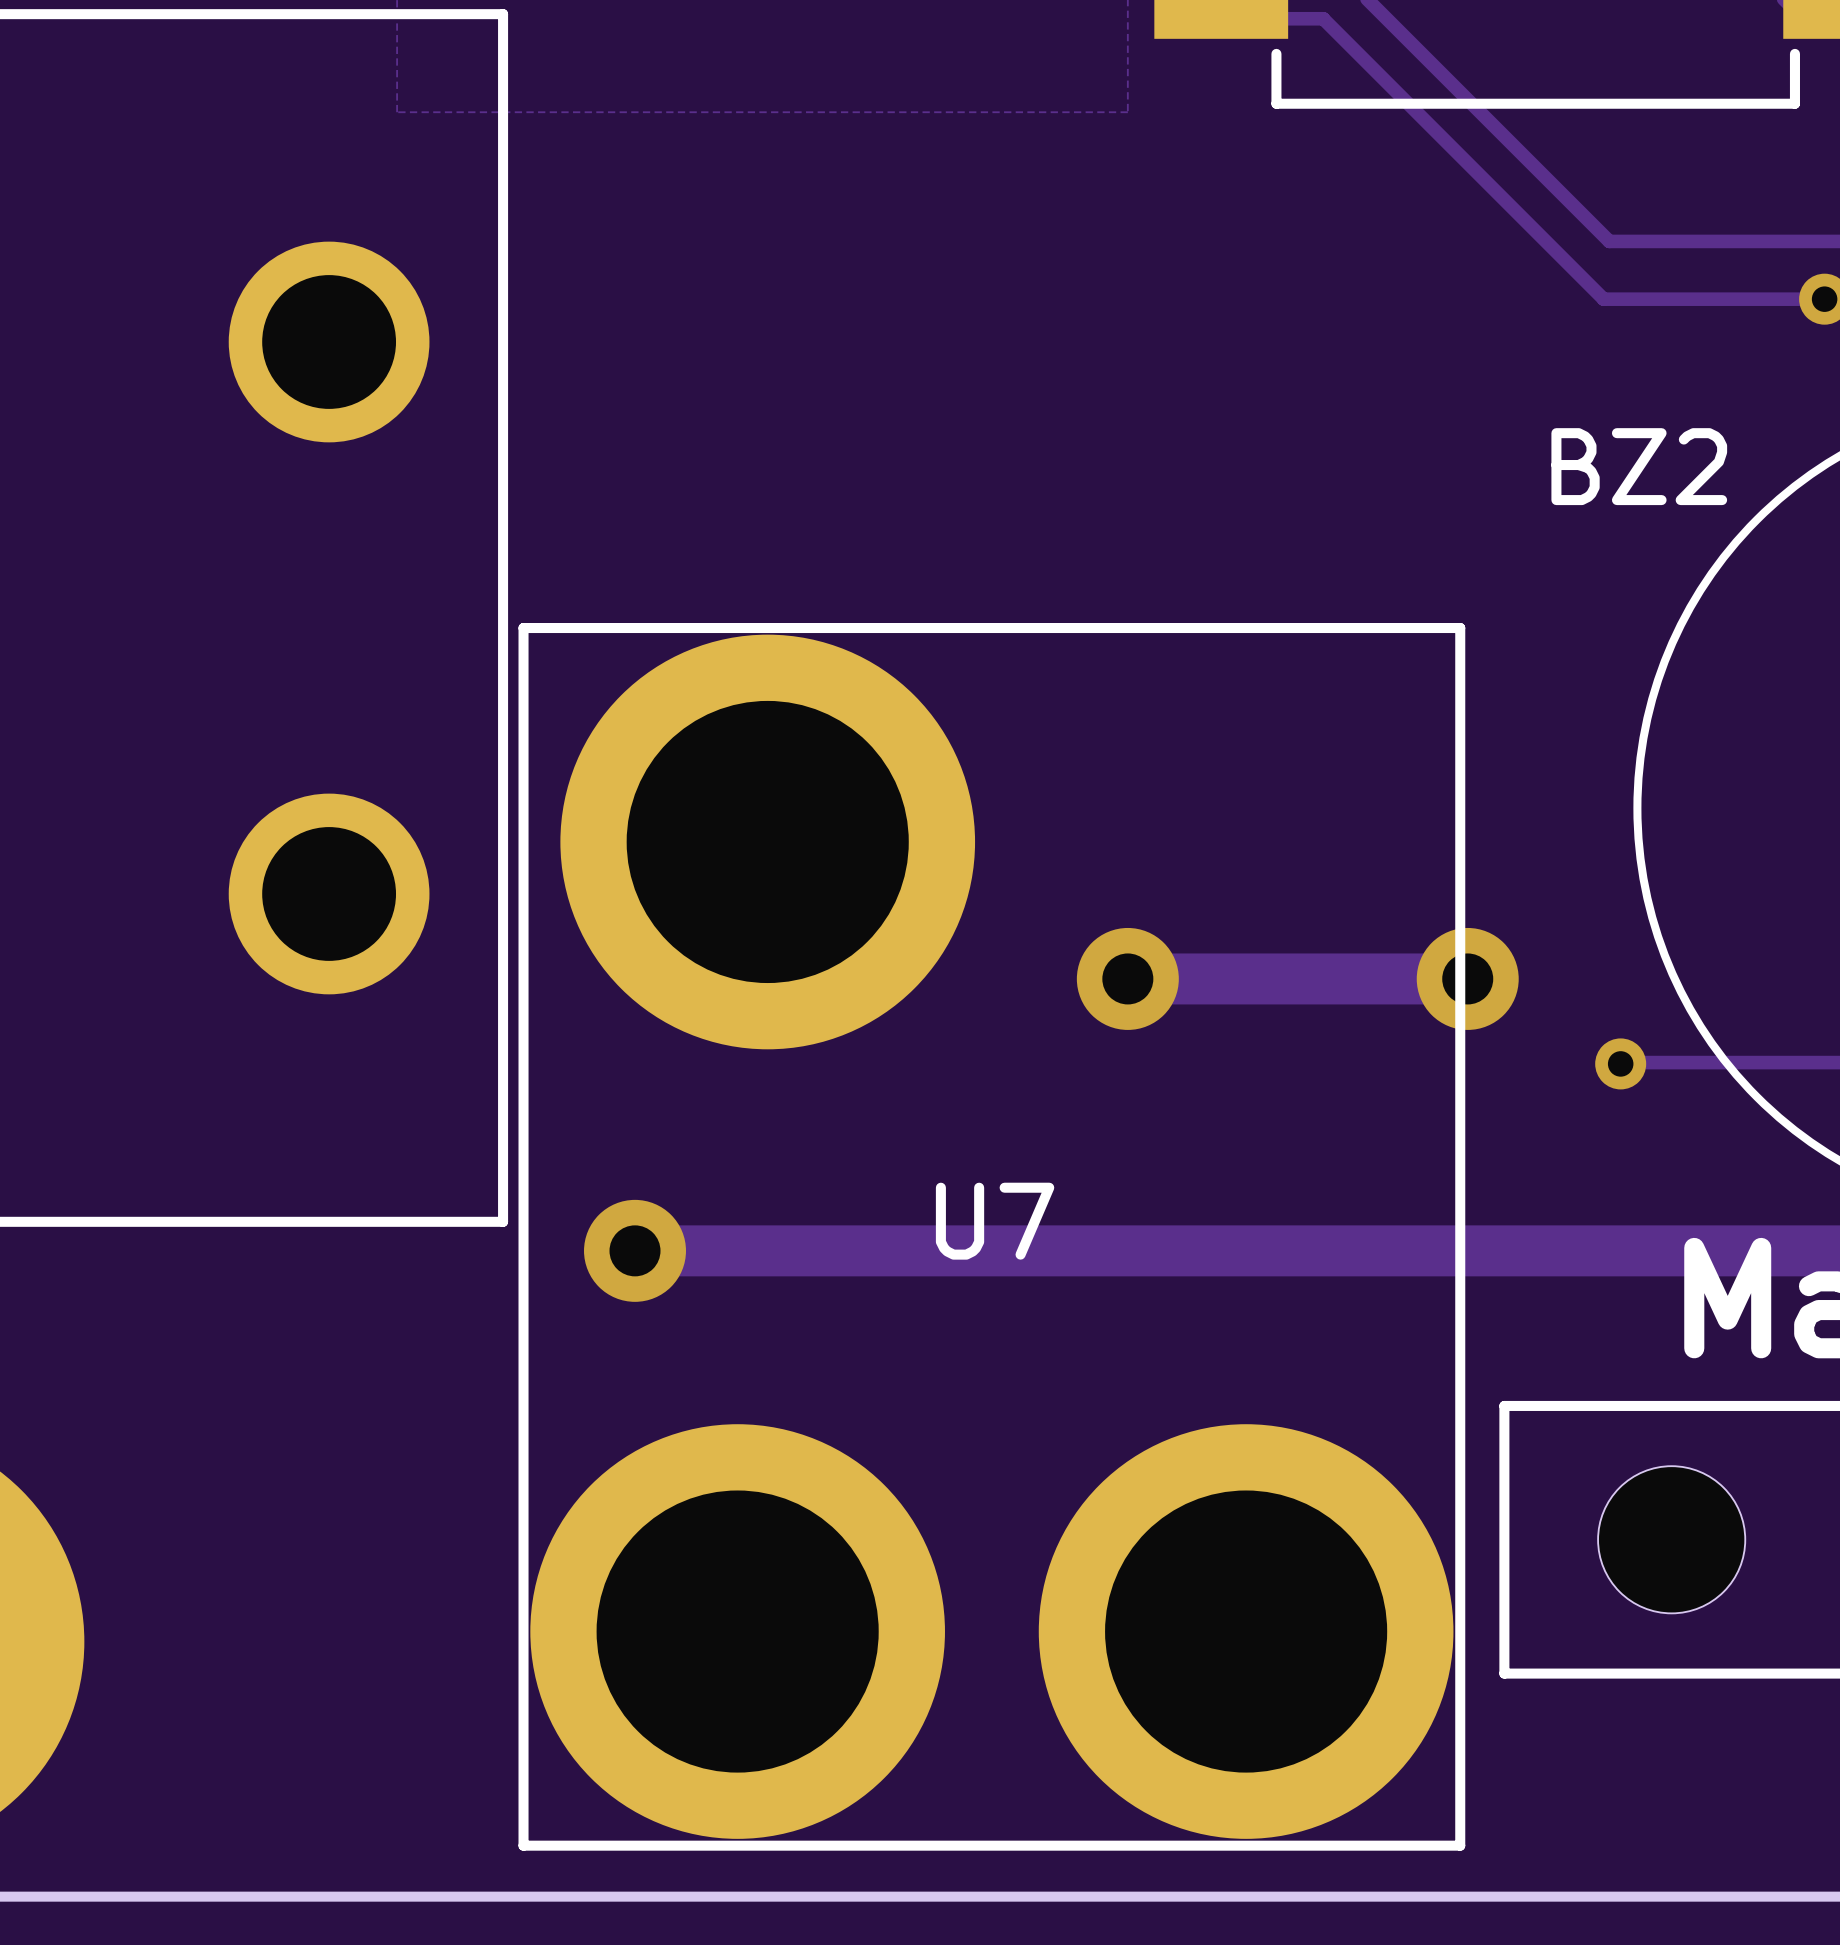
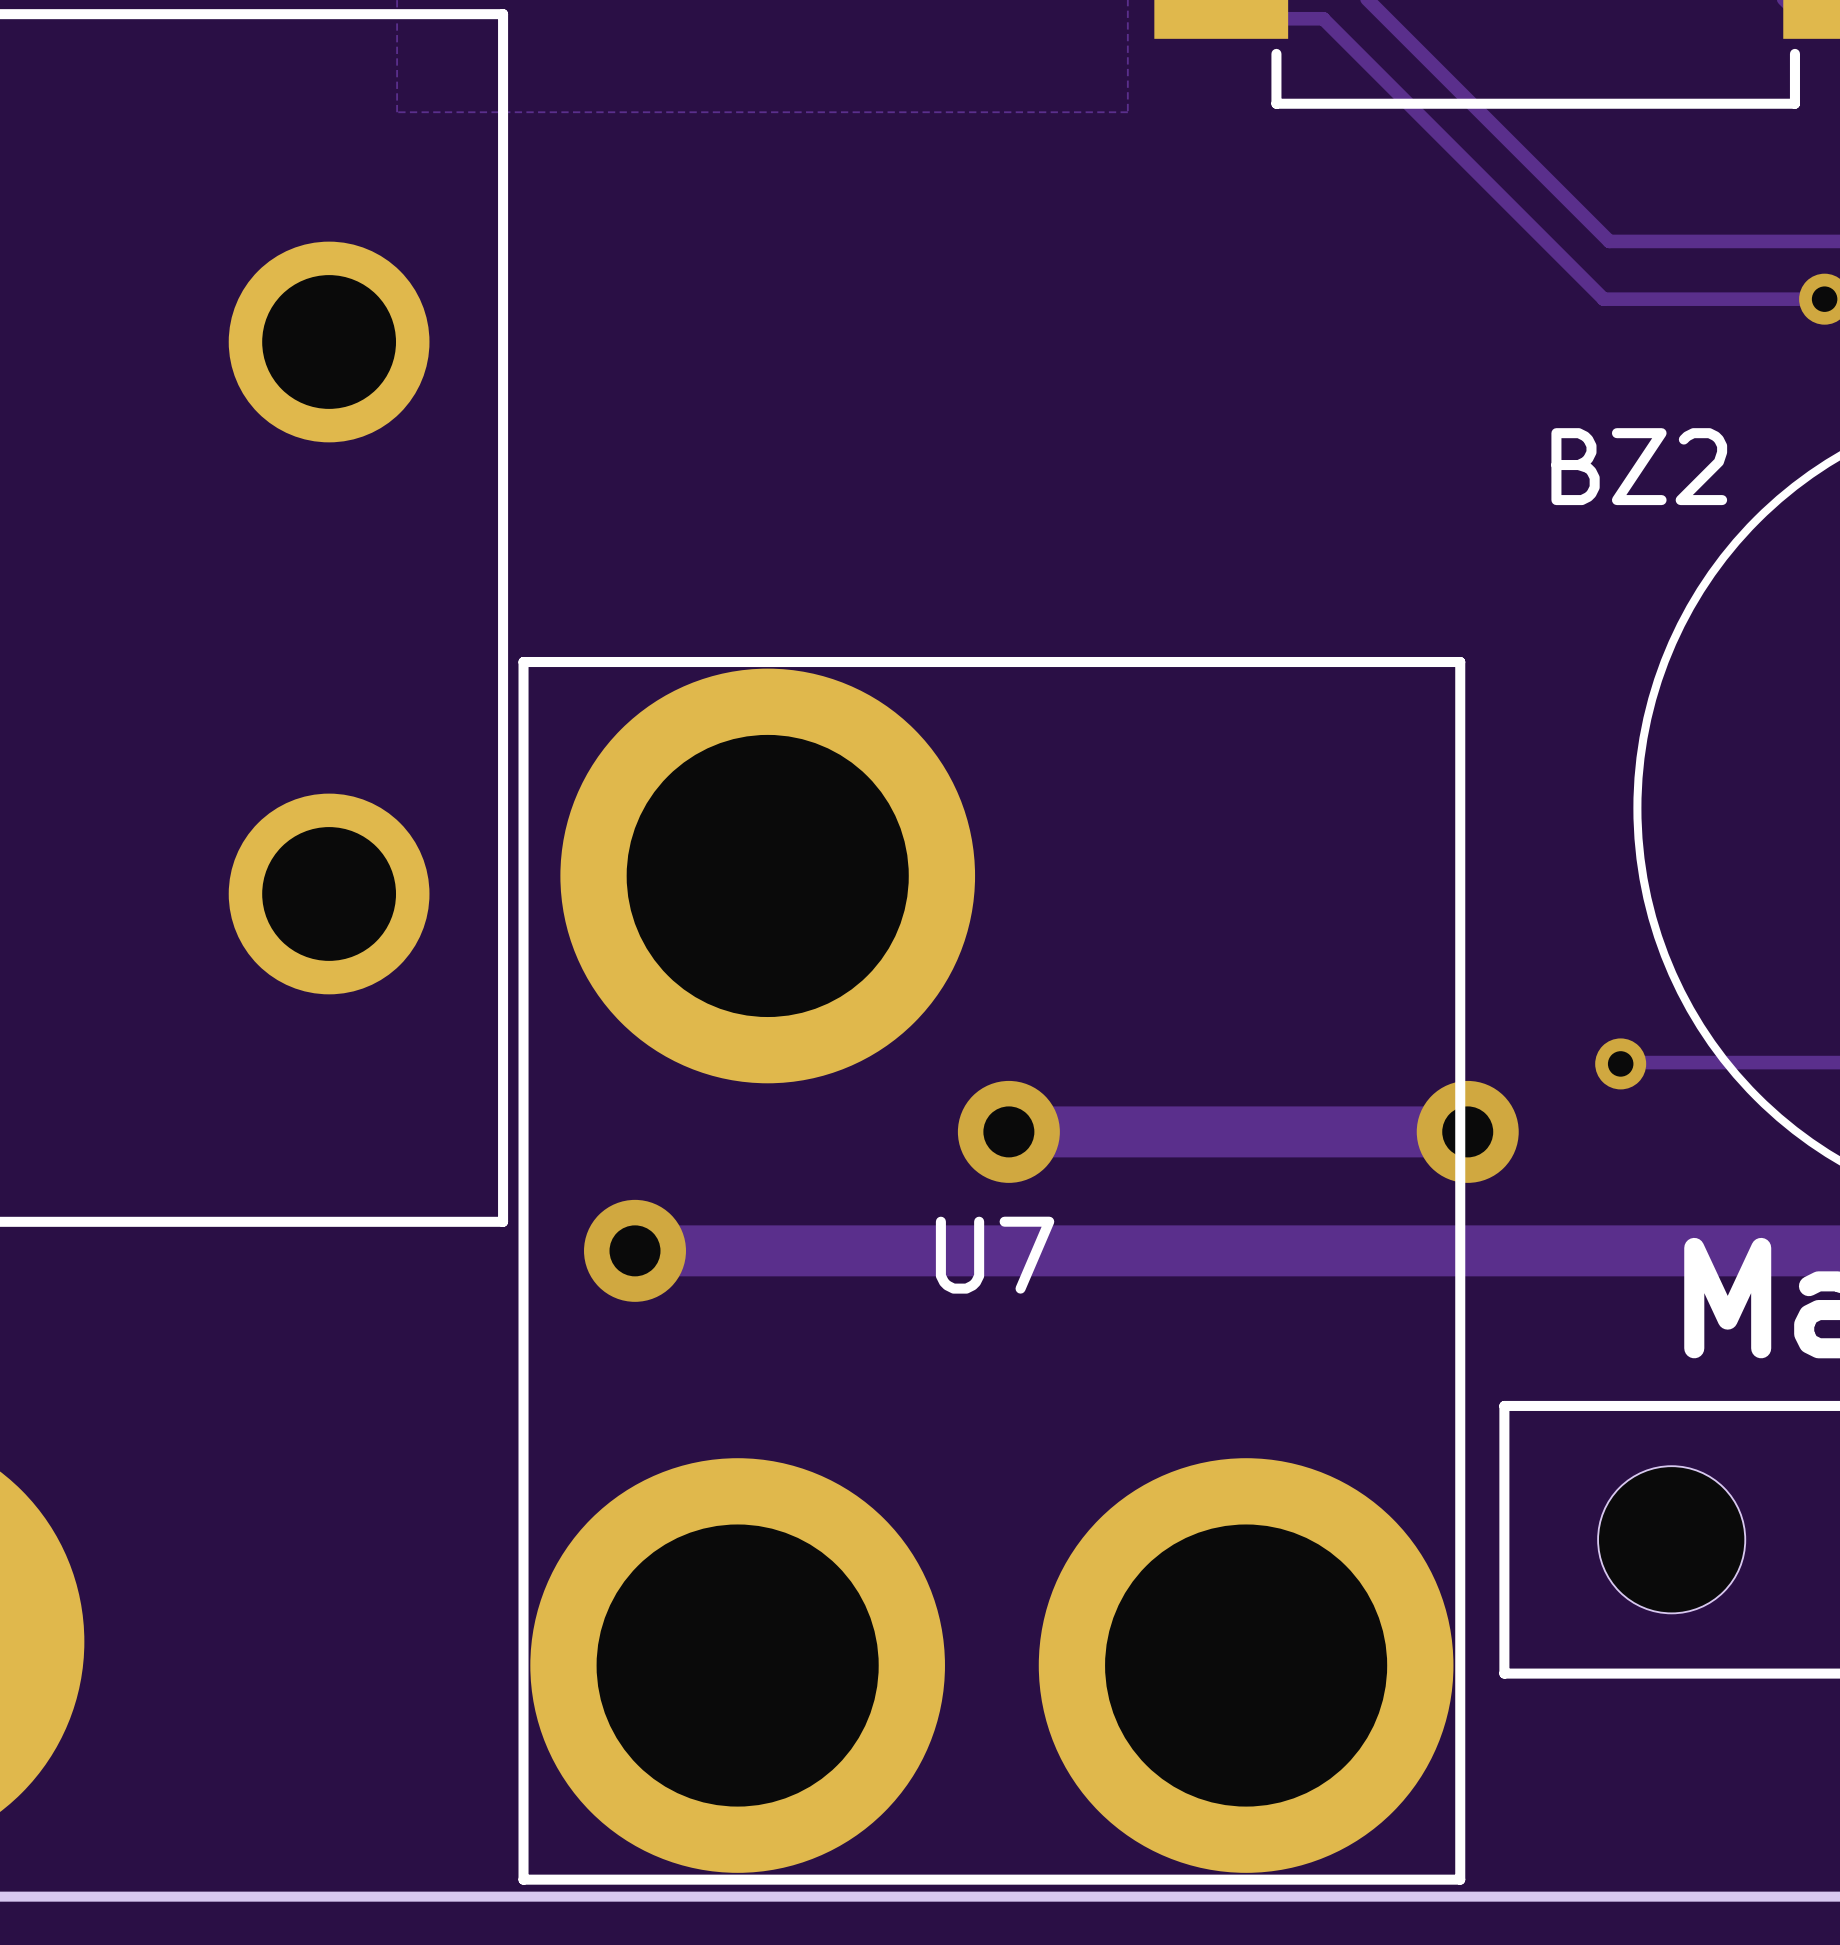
track: (1127, 978) (1467, 978) -> none
via: (1127, 978) -> none
via position: (1467, 978) -> (1467, 1131)
track: none -> (1008, 1131) (1467, 1131)
via: none -> (1008, 1131)
U7 position: (991, 1236) -> (991, 1270)

